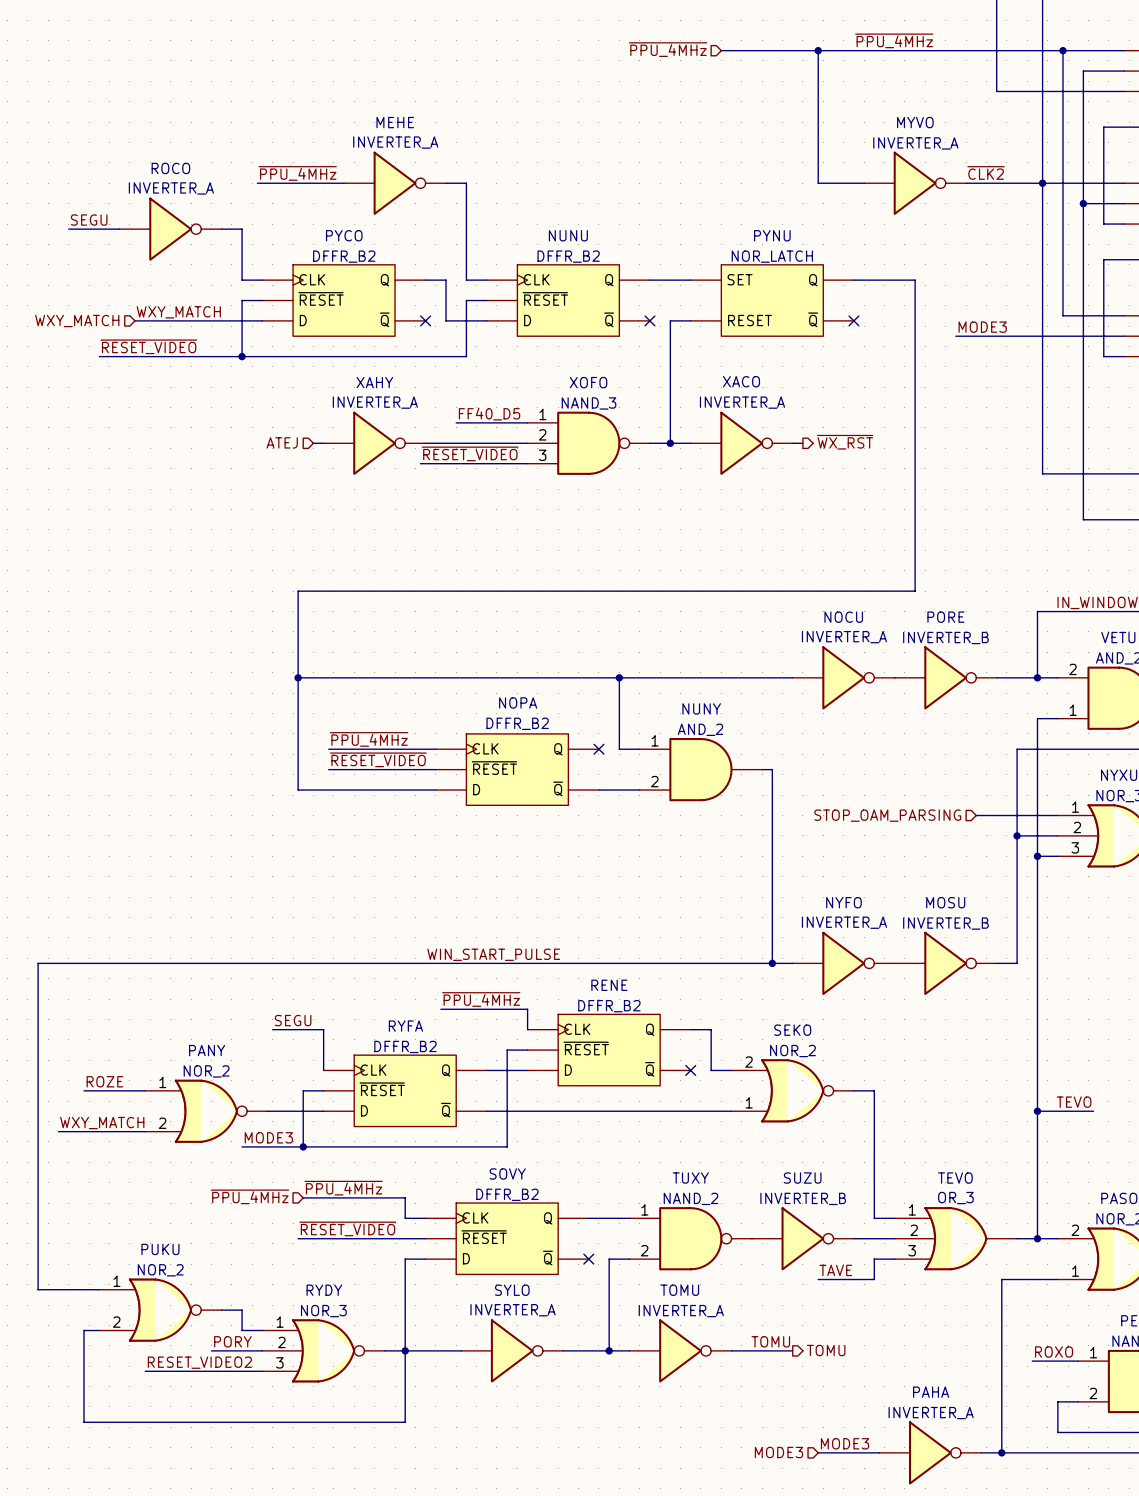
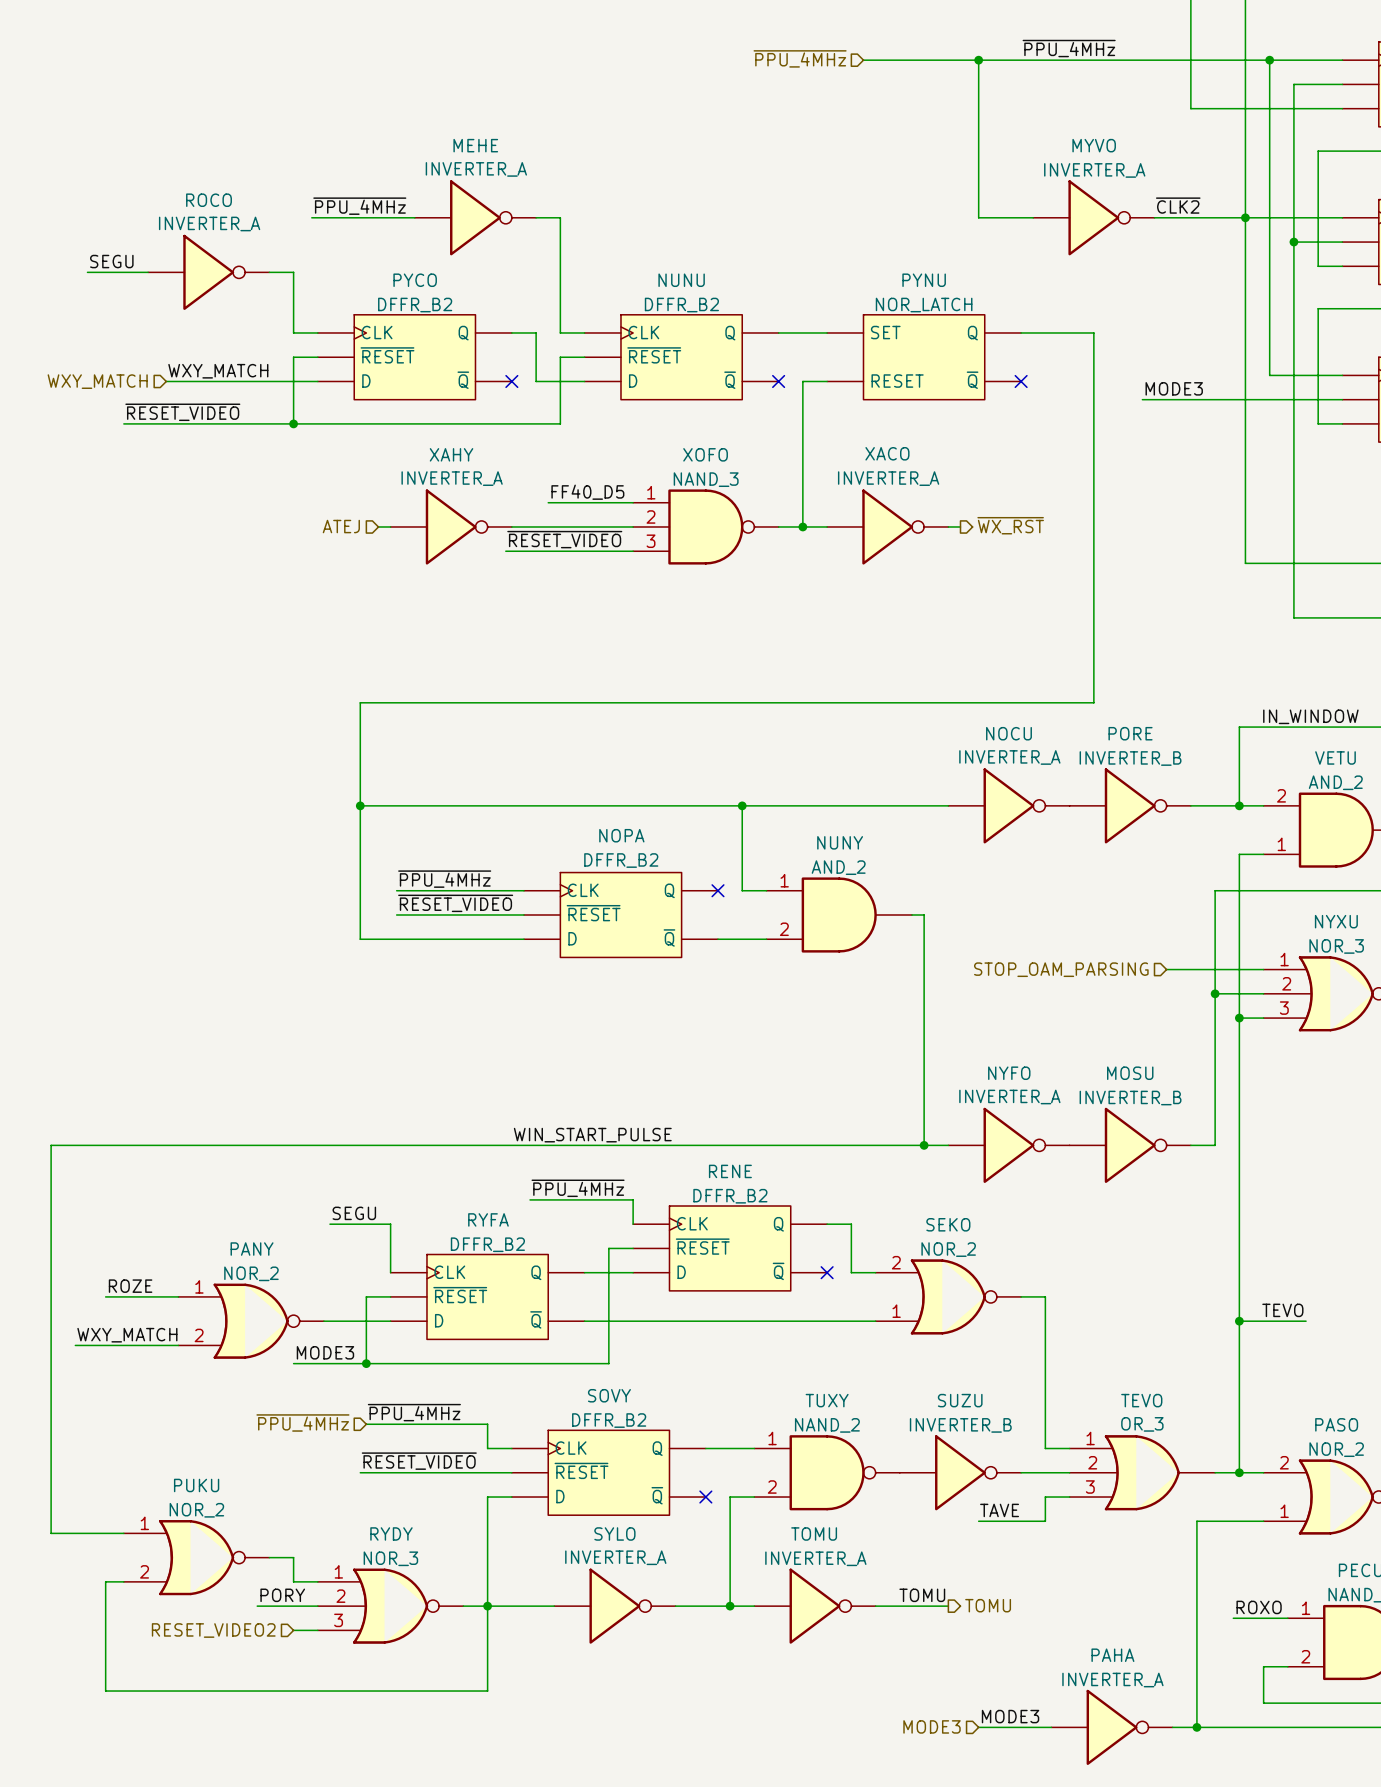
label: RESET_VIDEO2 (199, 1362) -> none
wire: (145, 1371) (242, 1371) -> none
hierarchical label: none -> RESET_VIDEO2 (213, 1630)

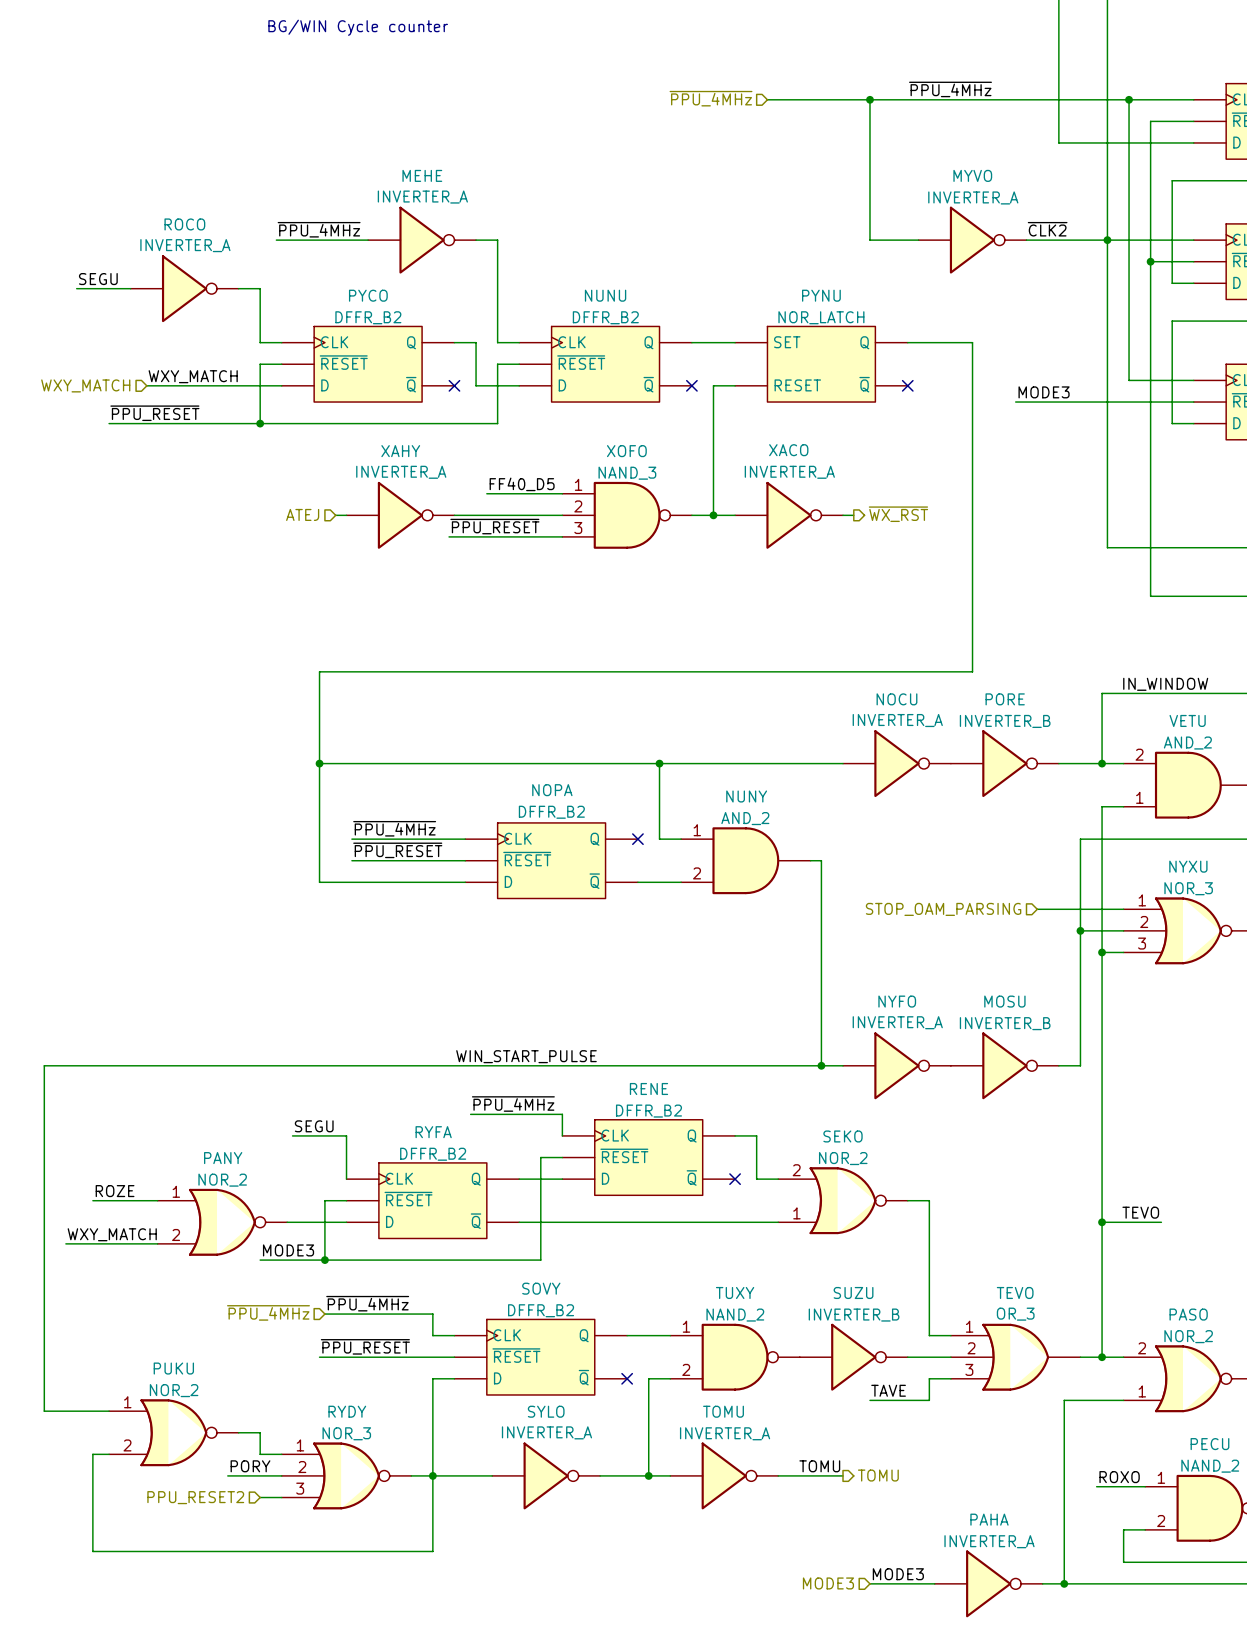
label: ~{RESET_VIDEO} (182, 412) -> ~{PPU_RESET} (154, 413)
label: ~{RESET_VIDEO} (564, 539) -> ~{PPU_RESET} (494, 526)
label: ~{RESET_VIDEO} (455, 903) -> ~{PPU_RESET} (397, 850)
label: ~{RESET_VIDEO} (419, 1461) -> ~{PPU_RESET} (365, 1346)
hierarchical label: RESET_VIDEO2 (213, 1630) -> PPU_RESET2 (195, 1497)

